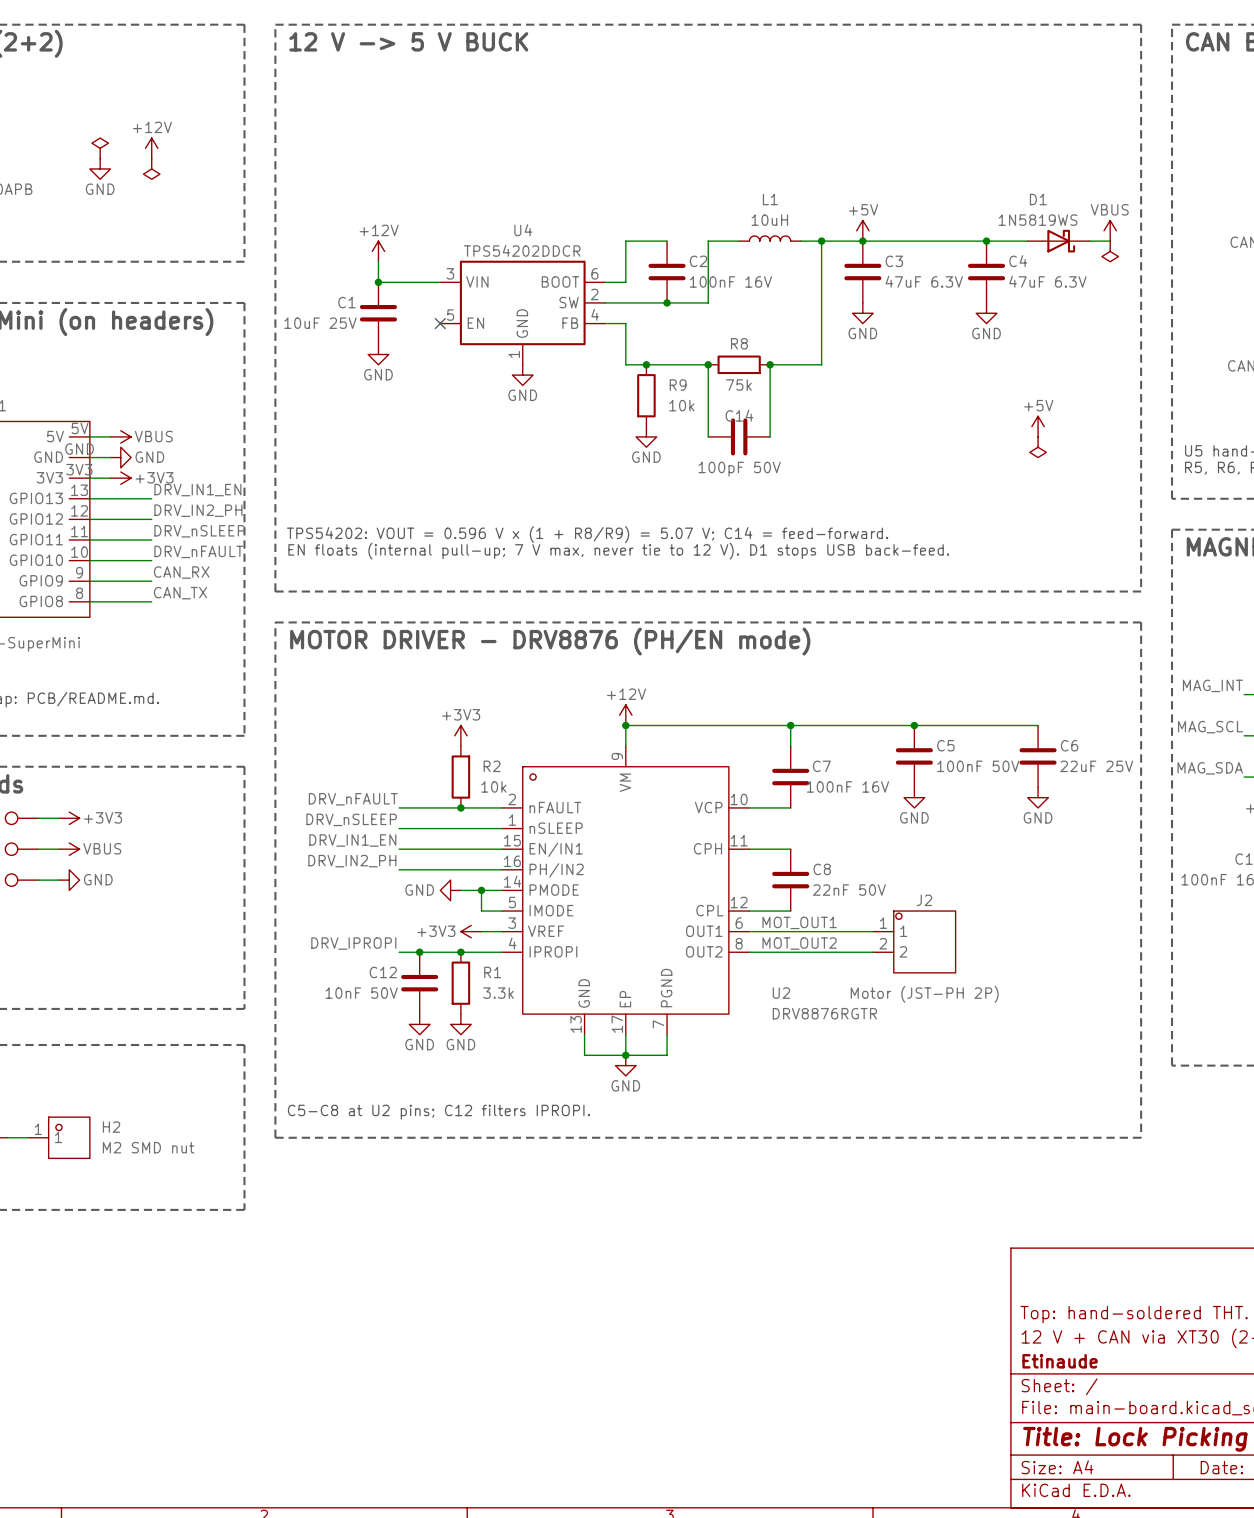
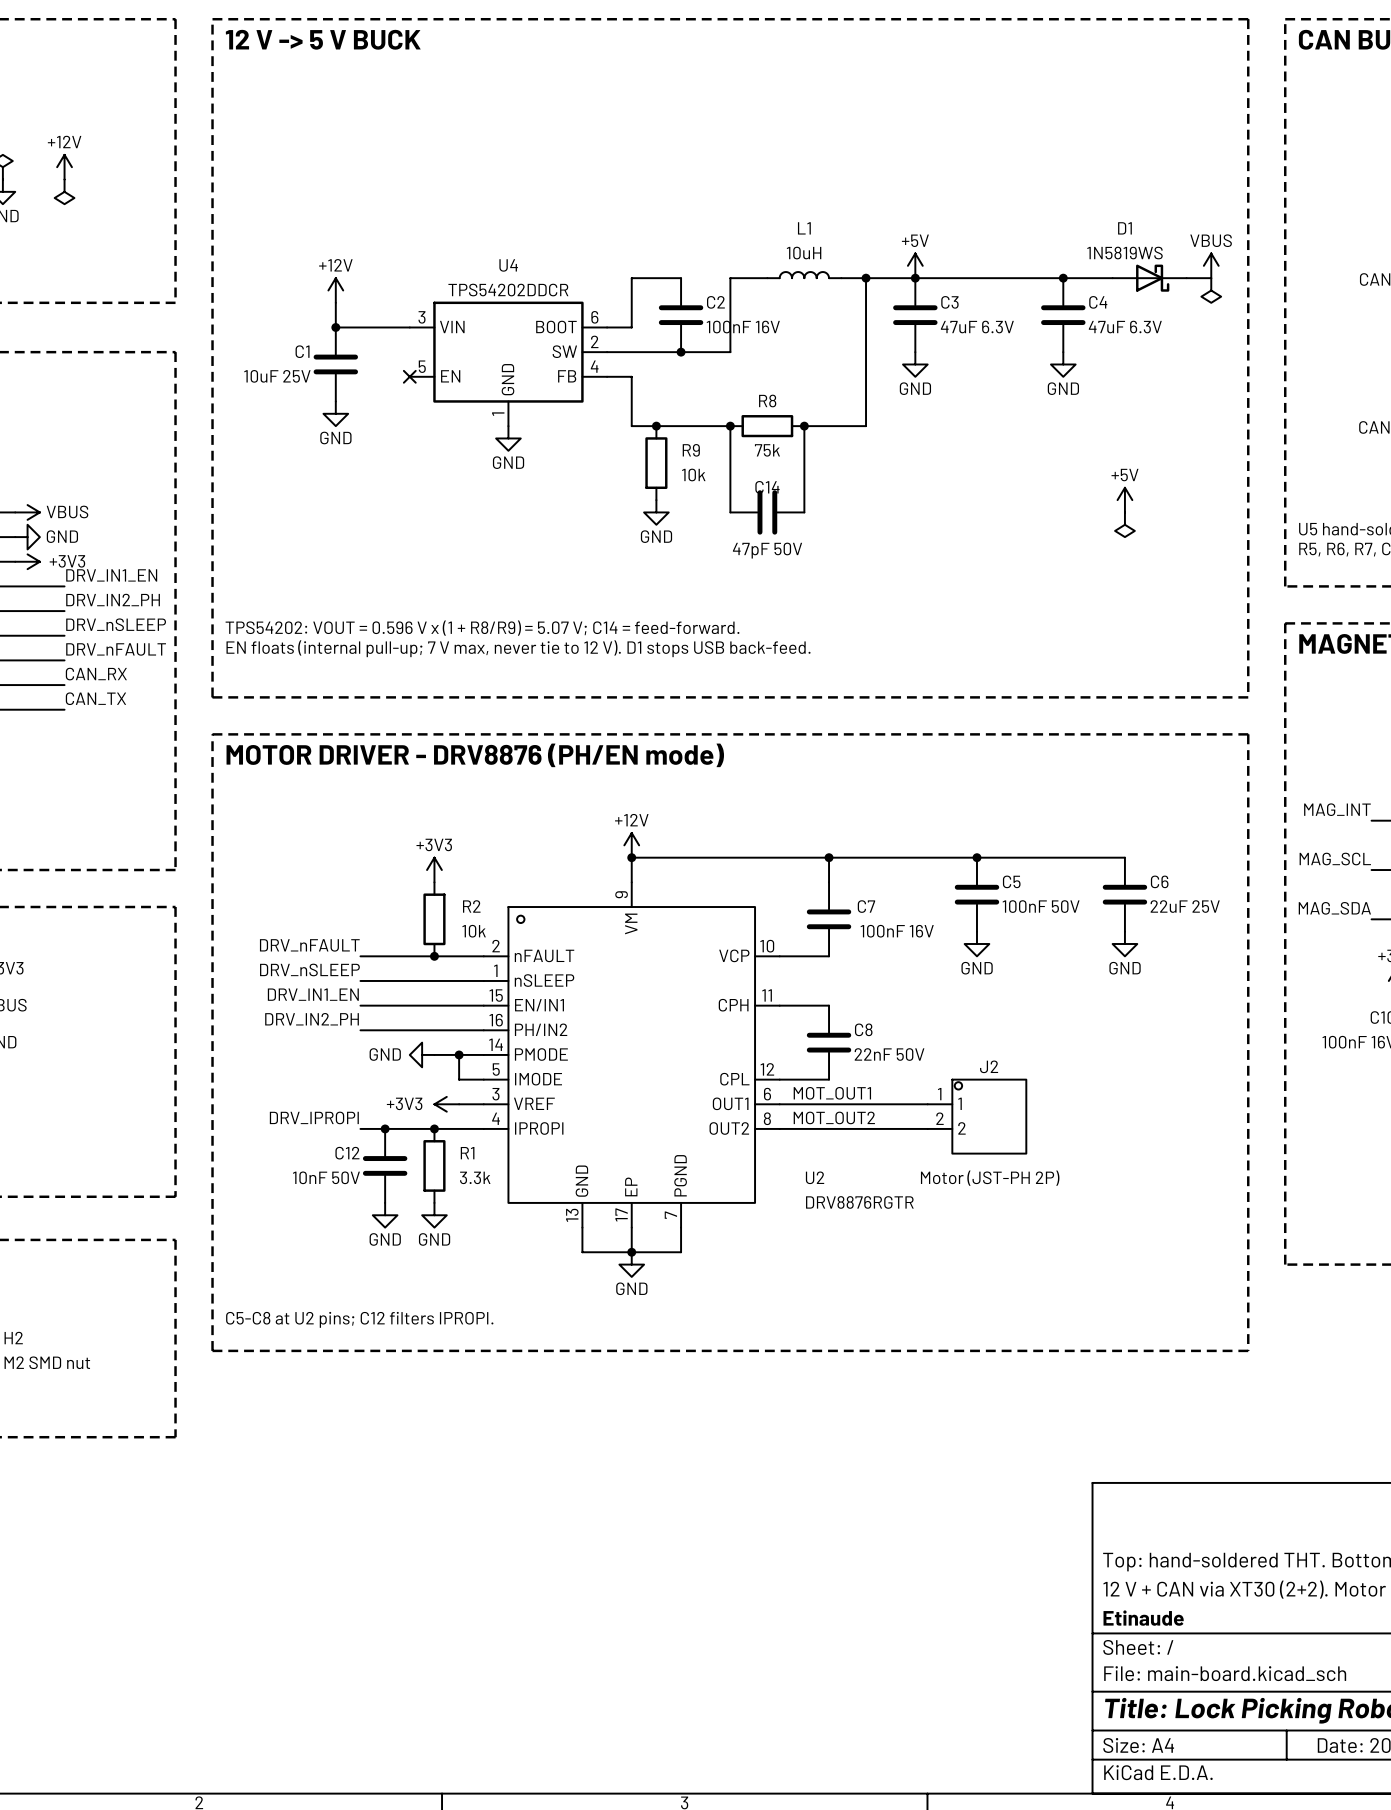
C14 value: 100pF 50V (739, 469) -> 47pF 50V (767, 550)

